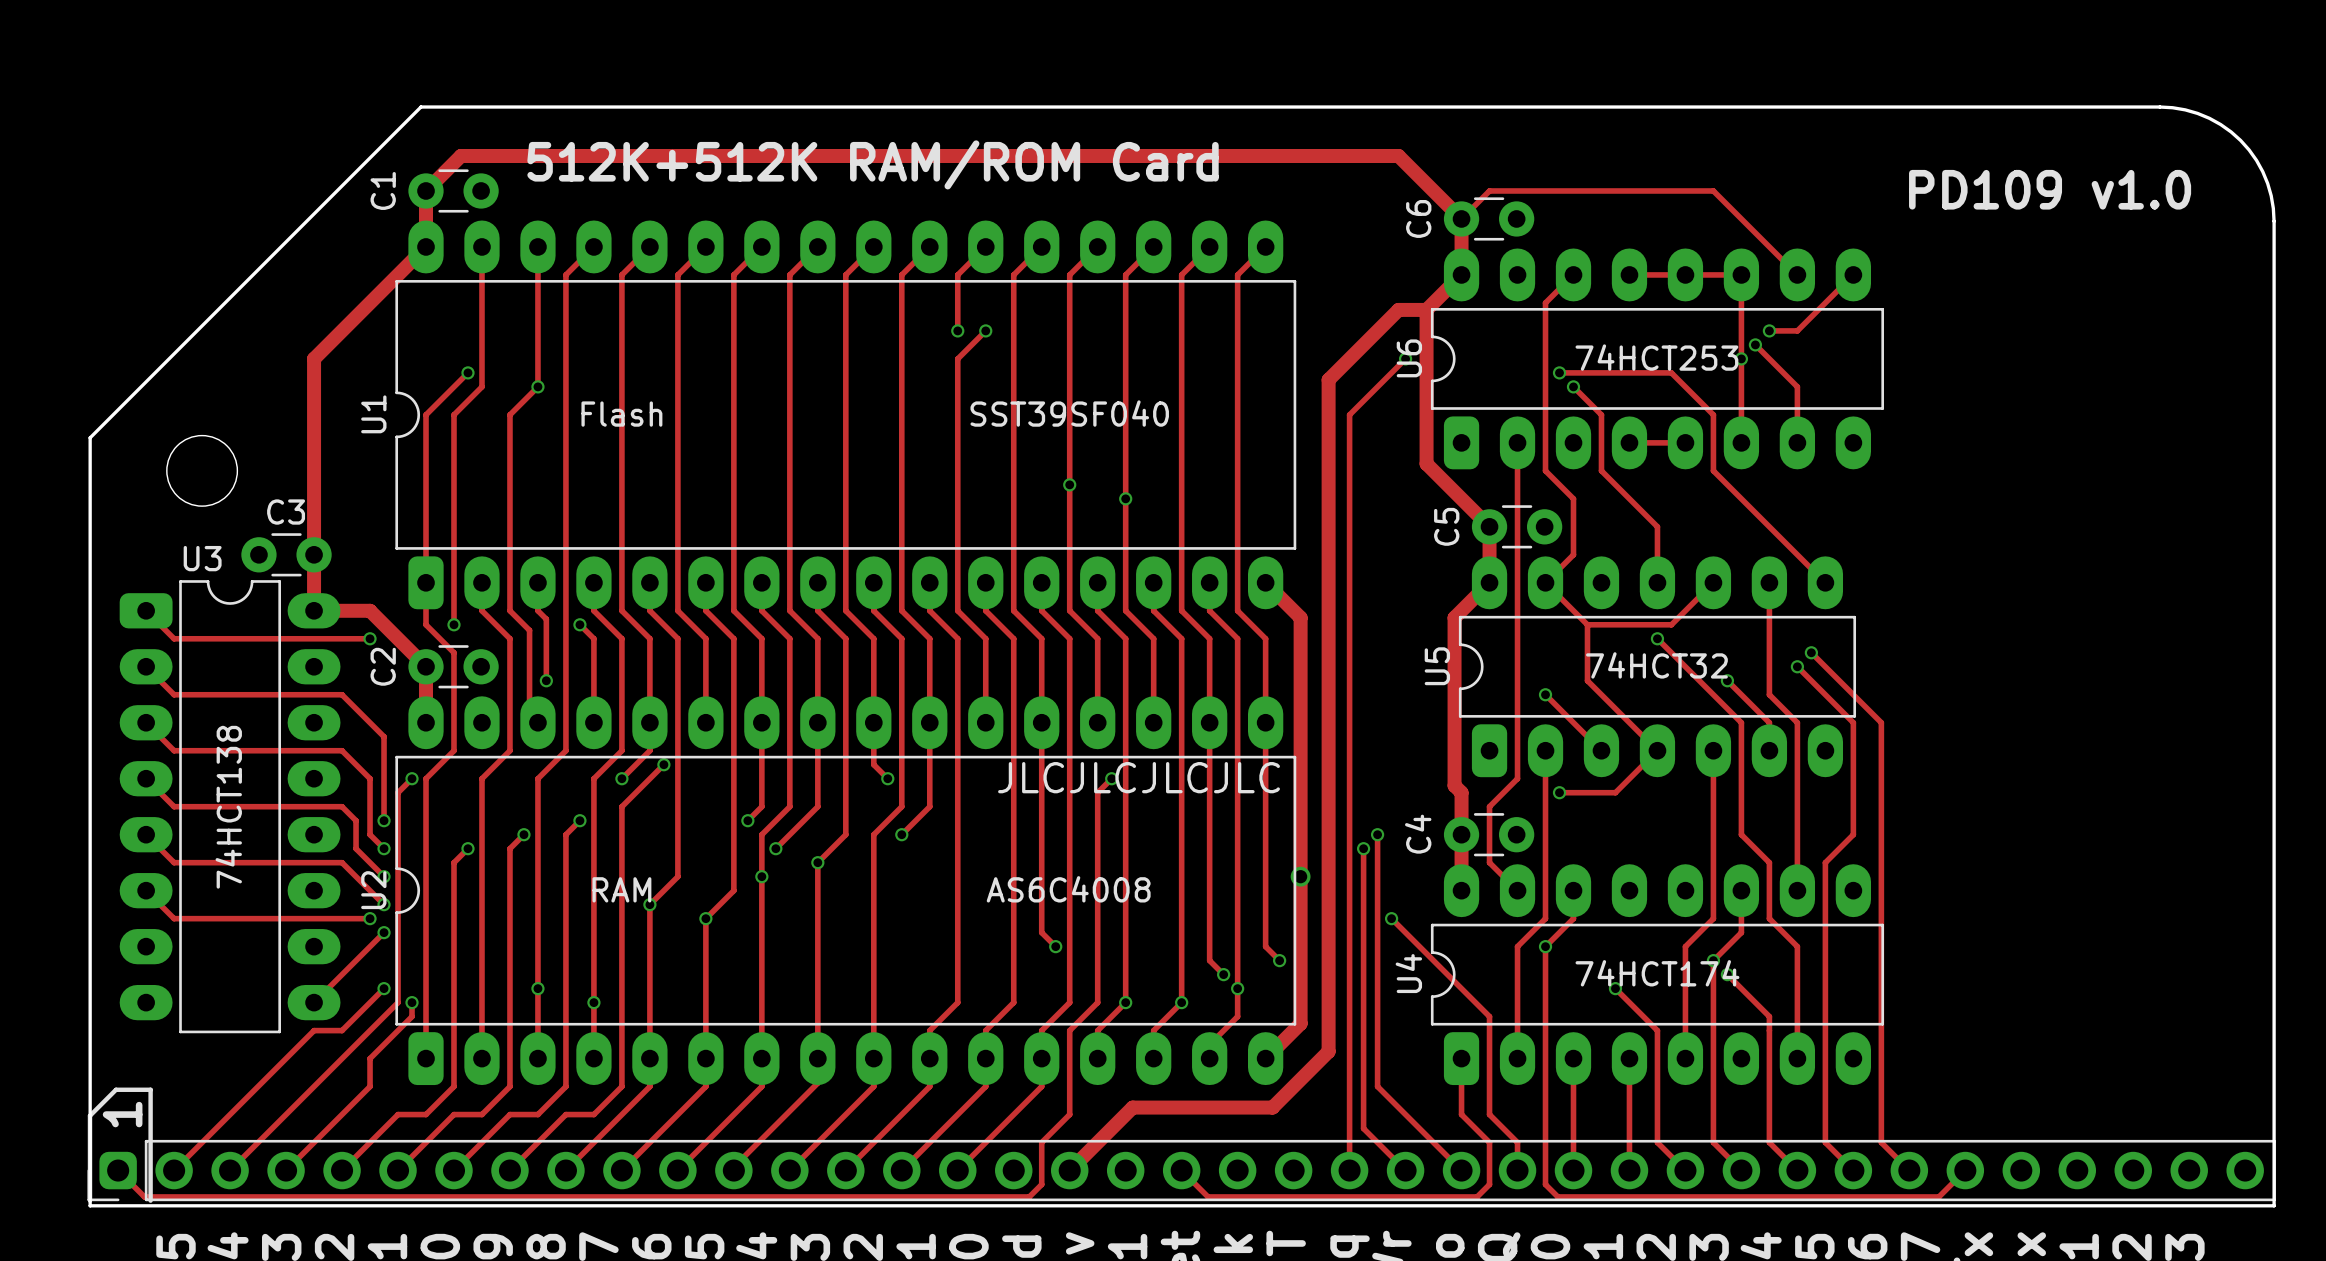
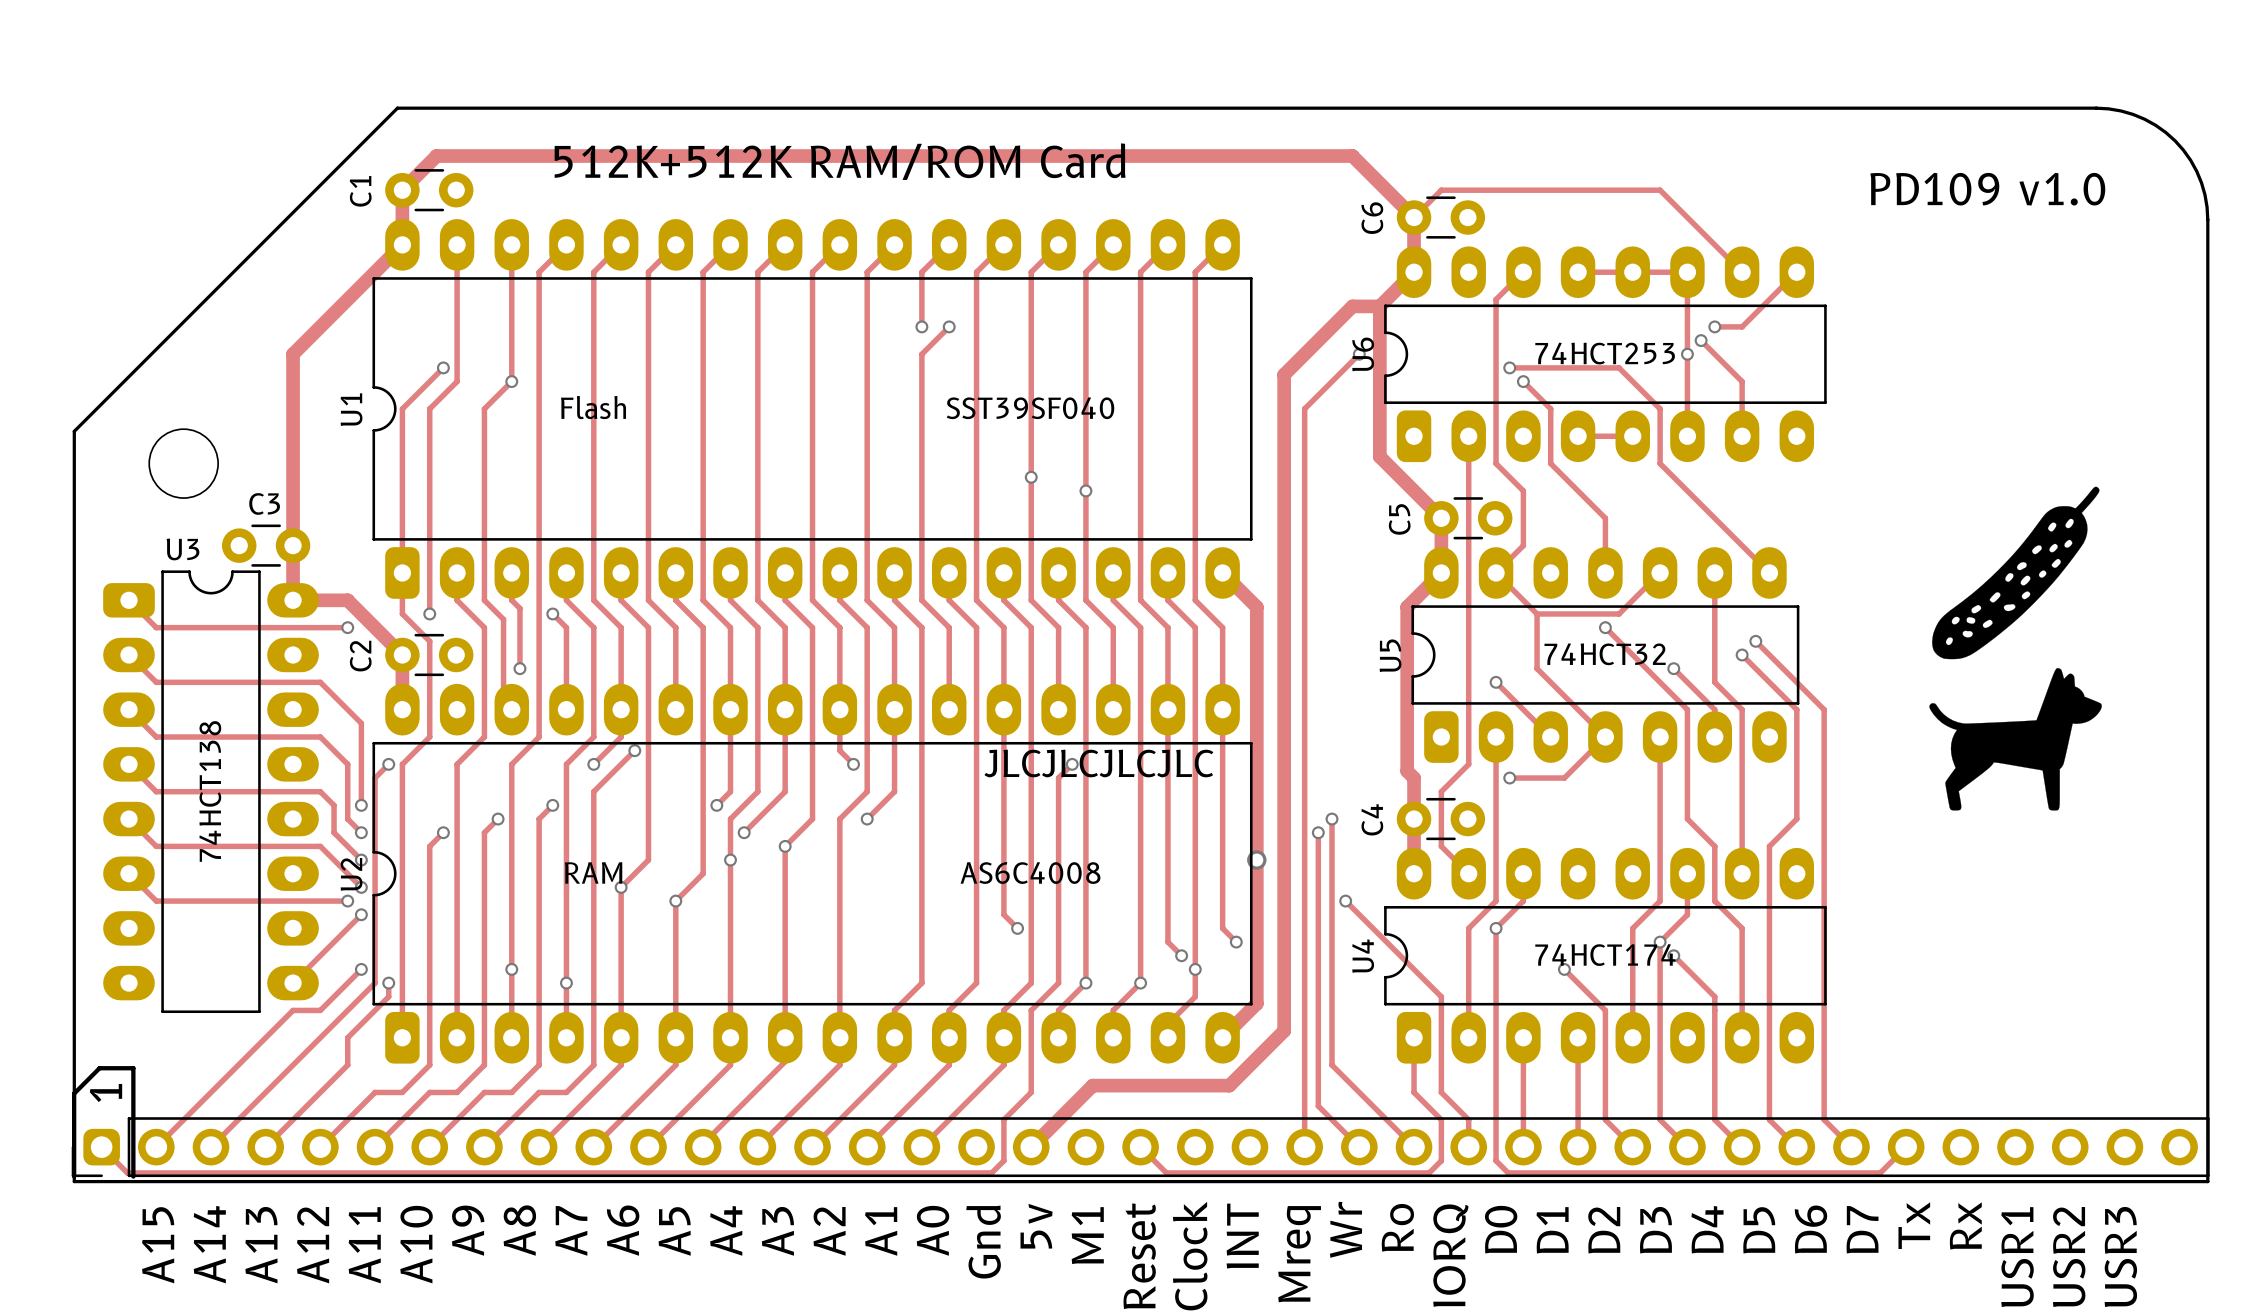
drawing: none -> [1929, 486, 2102, 811]

